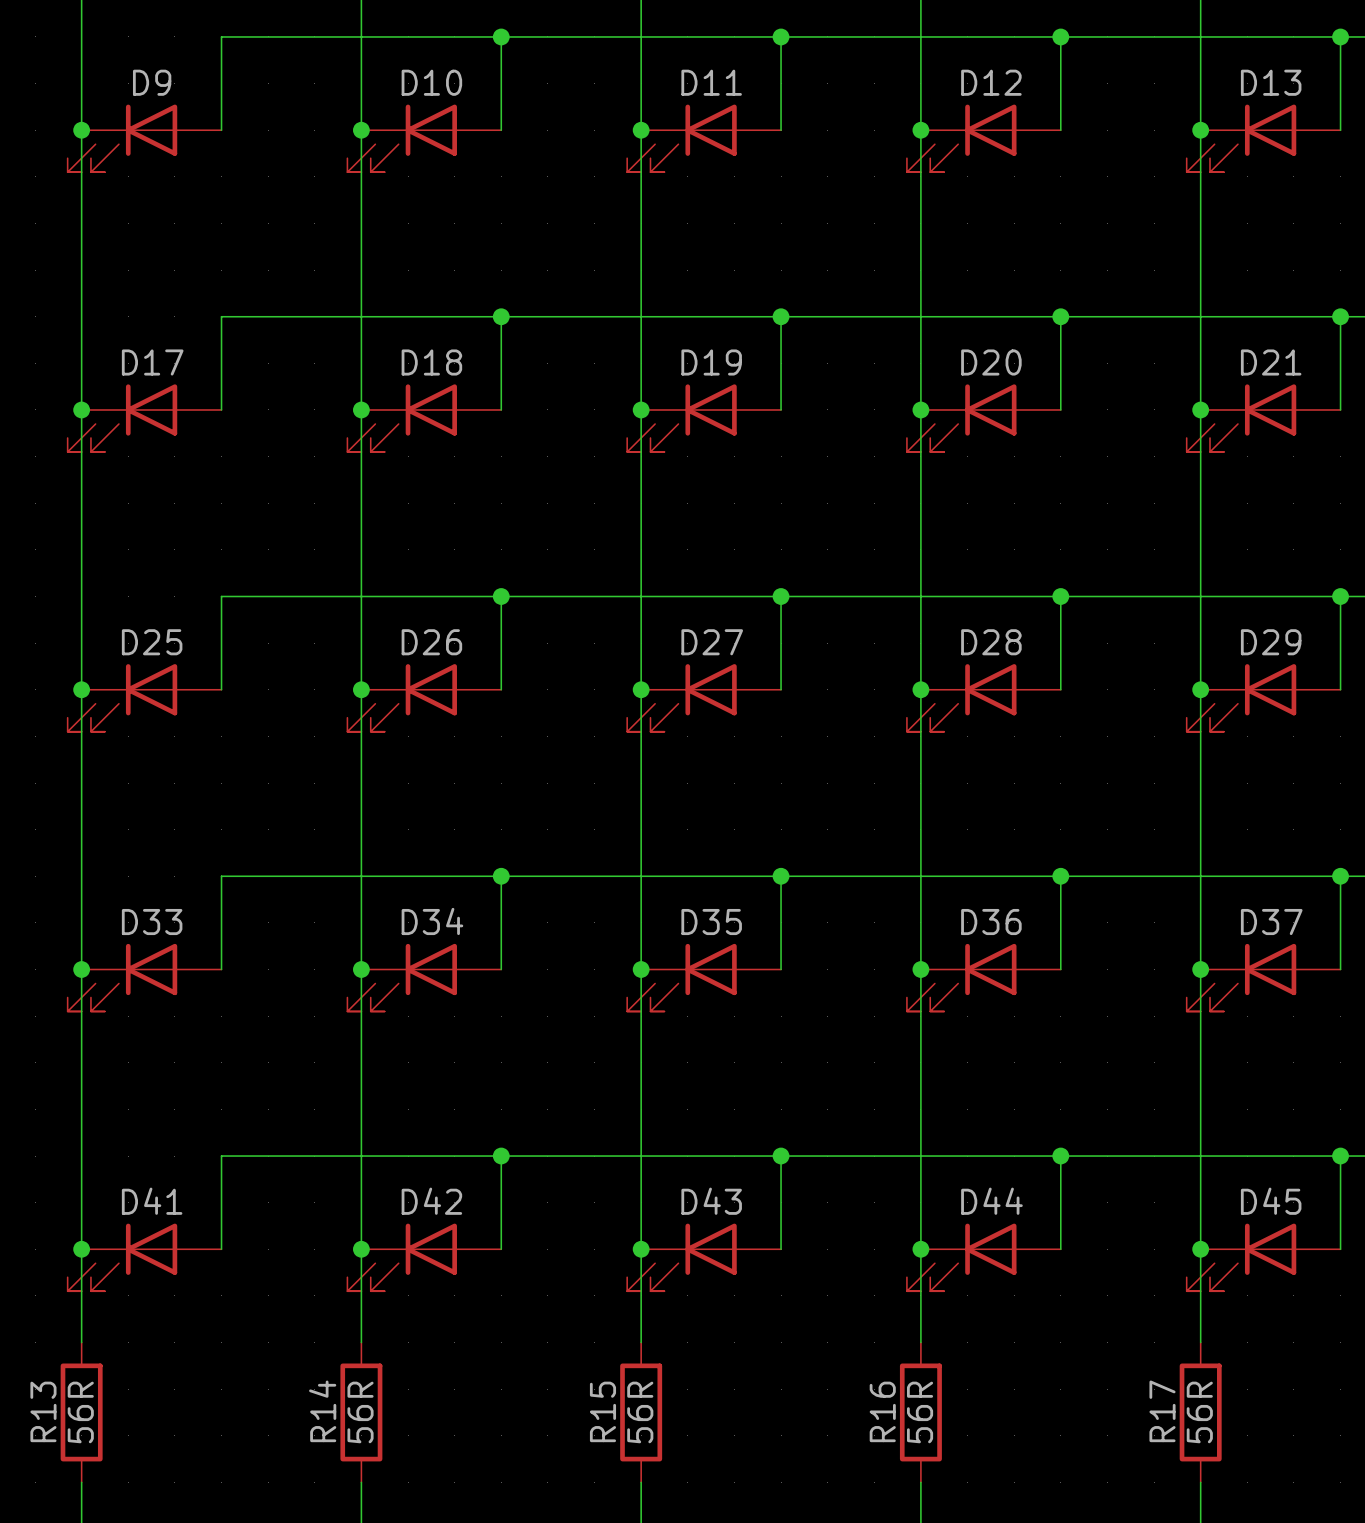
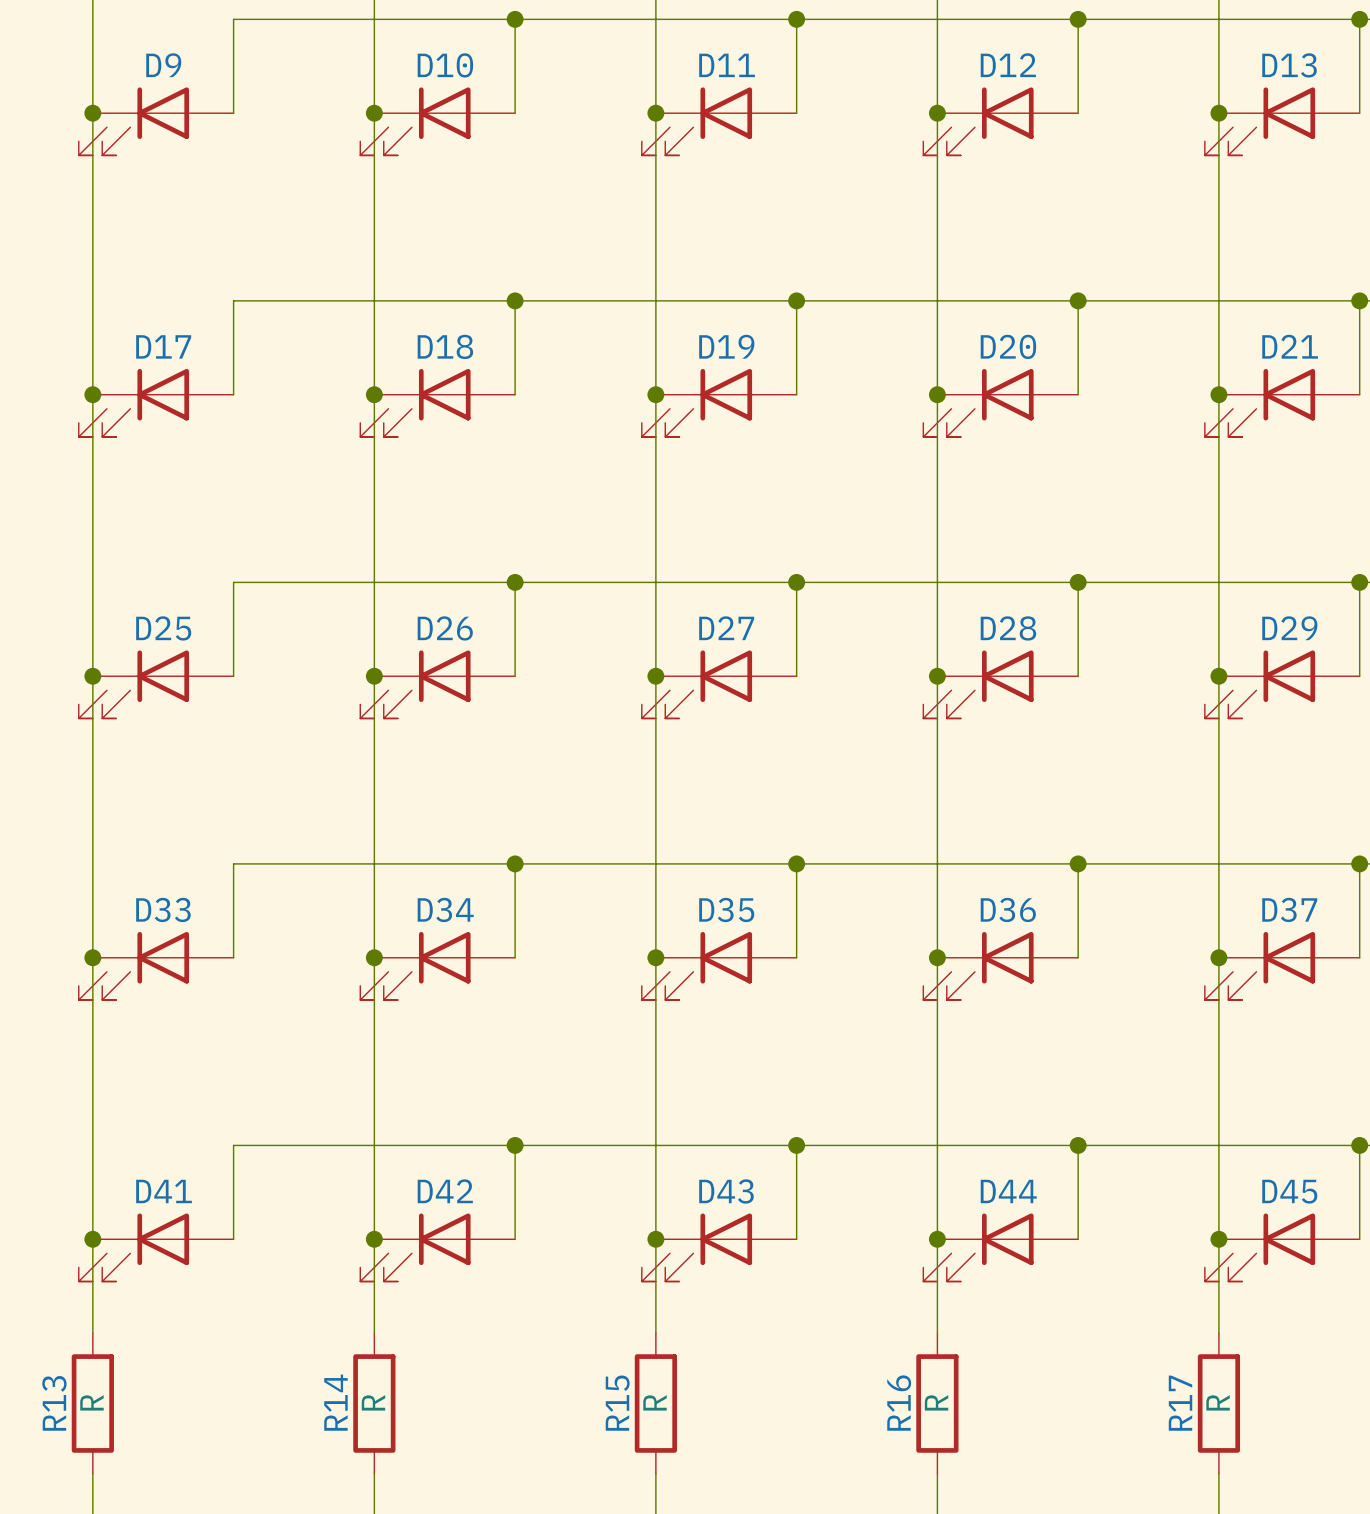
R13 value: 56R (80, 1412) -> R (91, 1402)
R14 value: 56R (360, 1412) -> R (373, 1402)
R15 value: 56R (640, 1412) -> R (655, 1402)
R16 value: 56R (920, 1412) -> R (936, 1402)
R17 value: 56R (1199, 1412) -> R (1218, 1402)

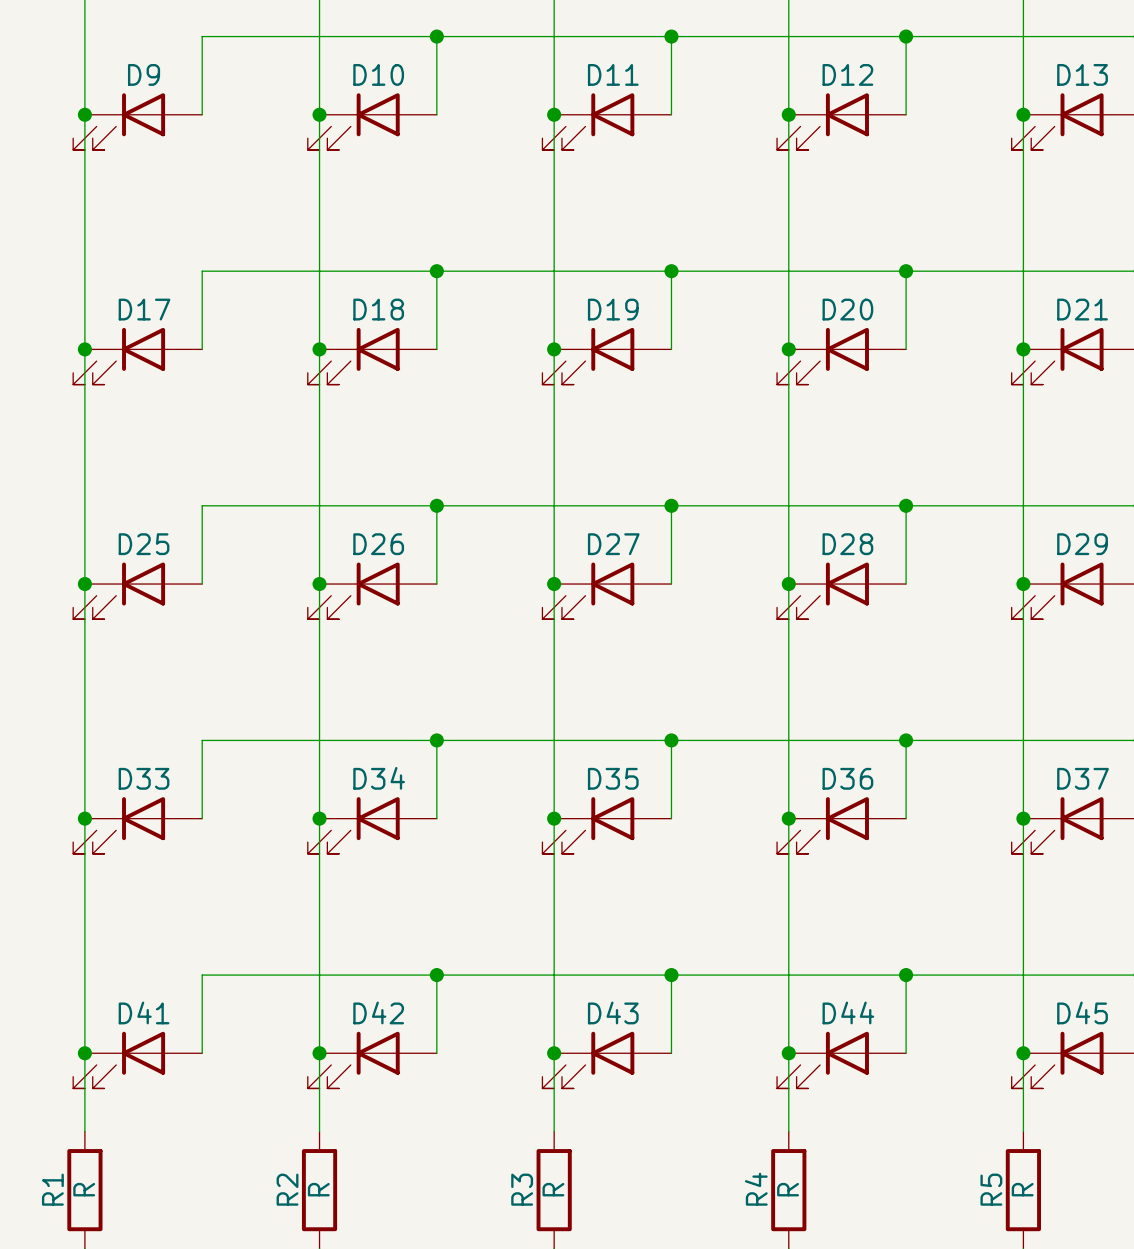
R14 name: R14 (335, 1402) -> R2 (287, 1189)
R13 name: R13 (54, 1403) -> R1 (52, 1189)
R15 name: R15 (617, 1403) -> R3 (522, 1189)
R16 name: R16 (899, 1403) -> R4 (756, 1189)
R17 name: R17 (1180, 1403) -> R5 (991, 1189)

